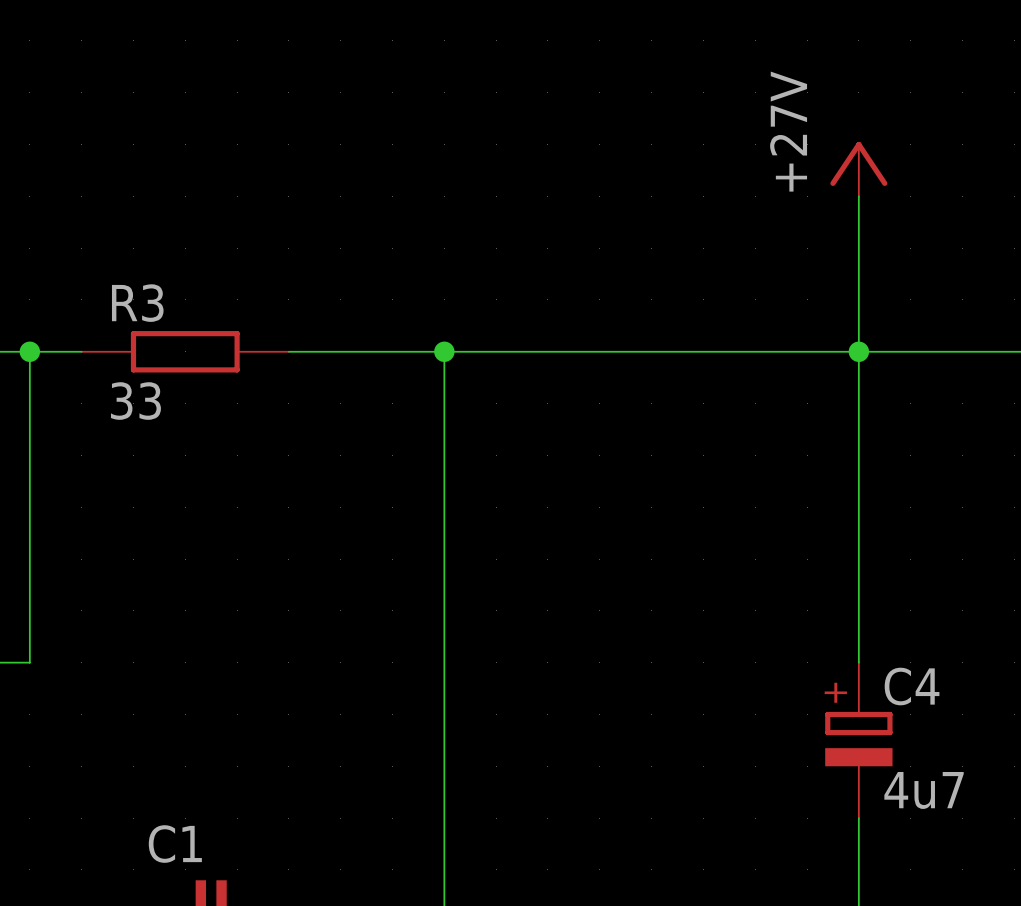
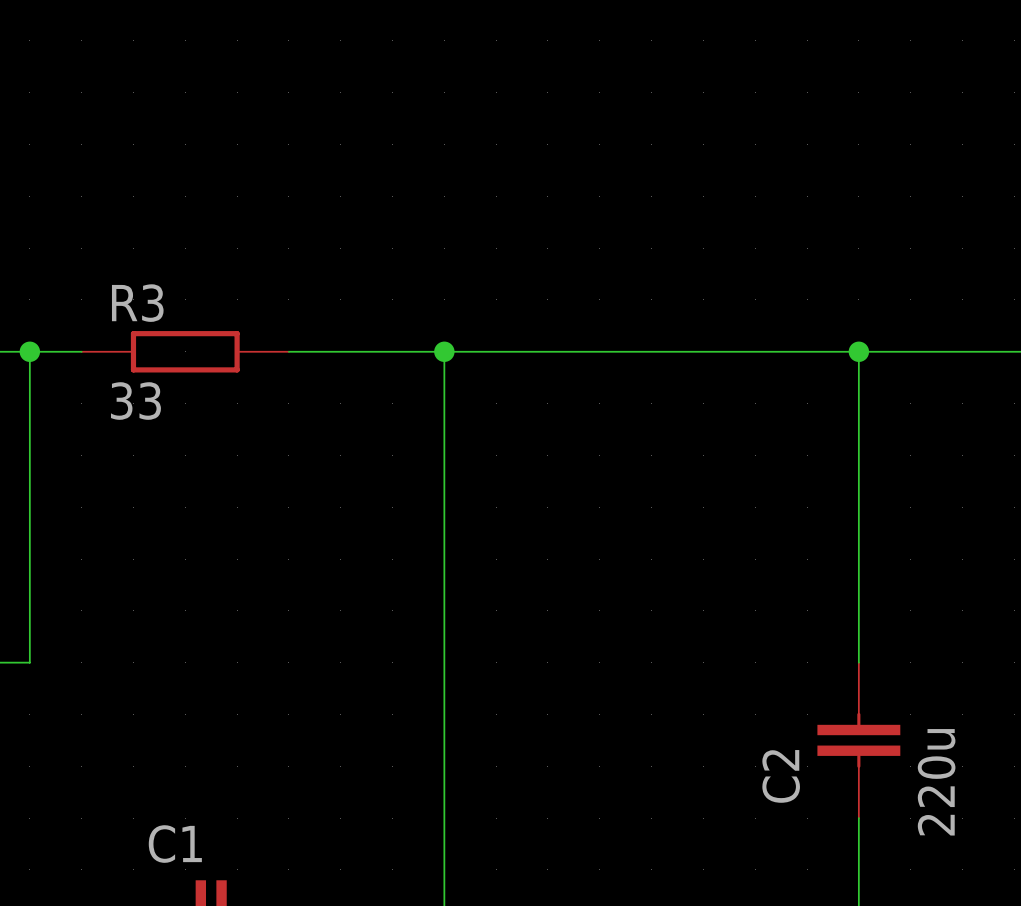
power symbol: +27V (858, 169) -> none
wire: (858, 196) (858, 351) -> none
C4: 4u7 (858, 740) -> none
C2: none -> 220u (858, 740)

